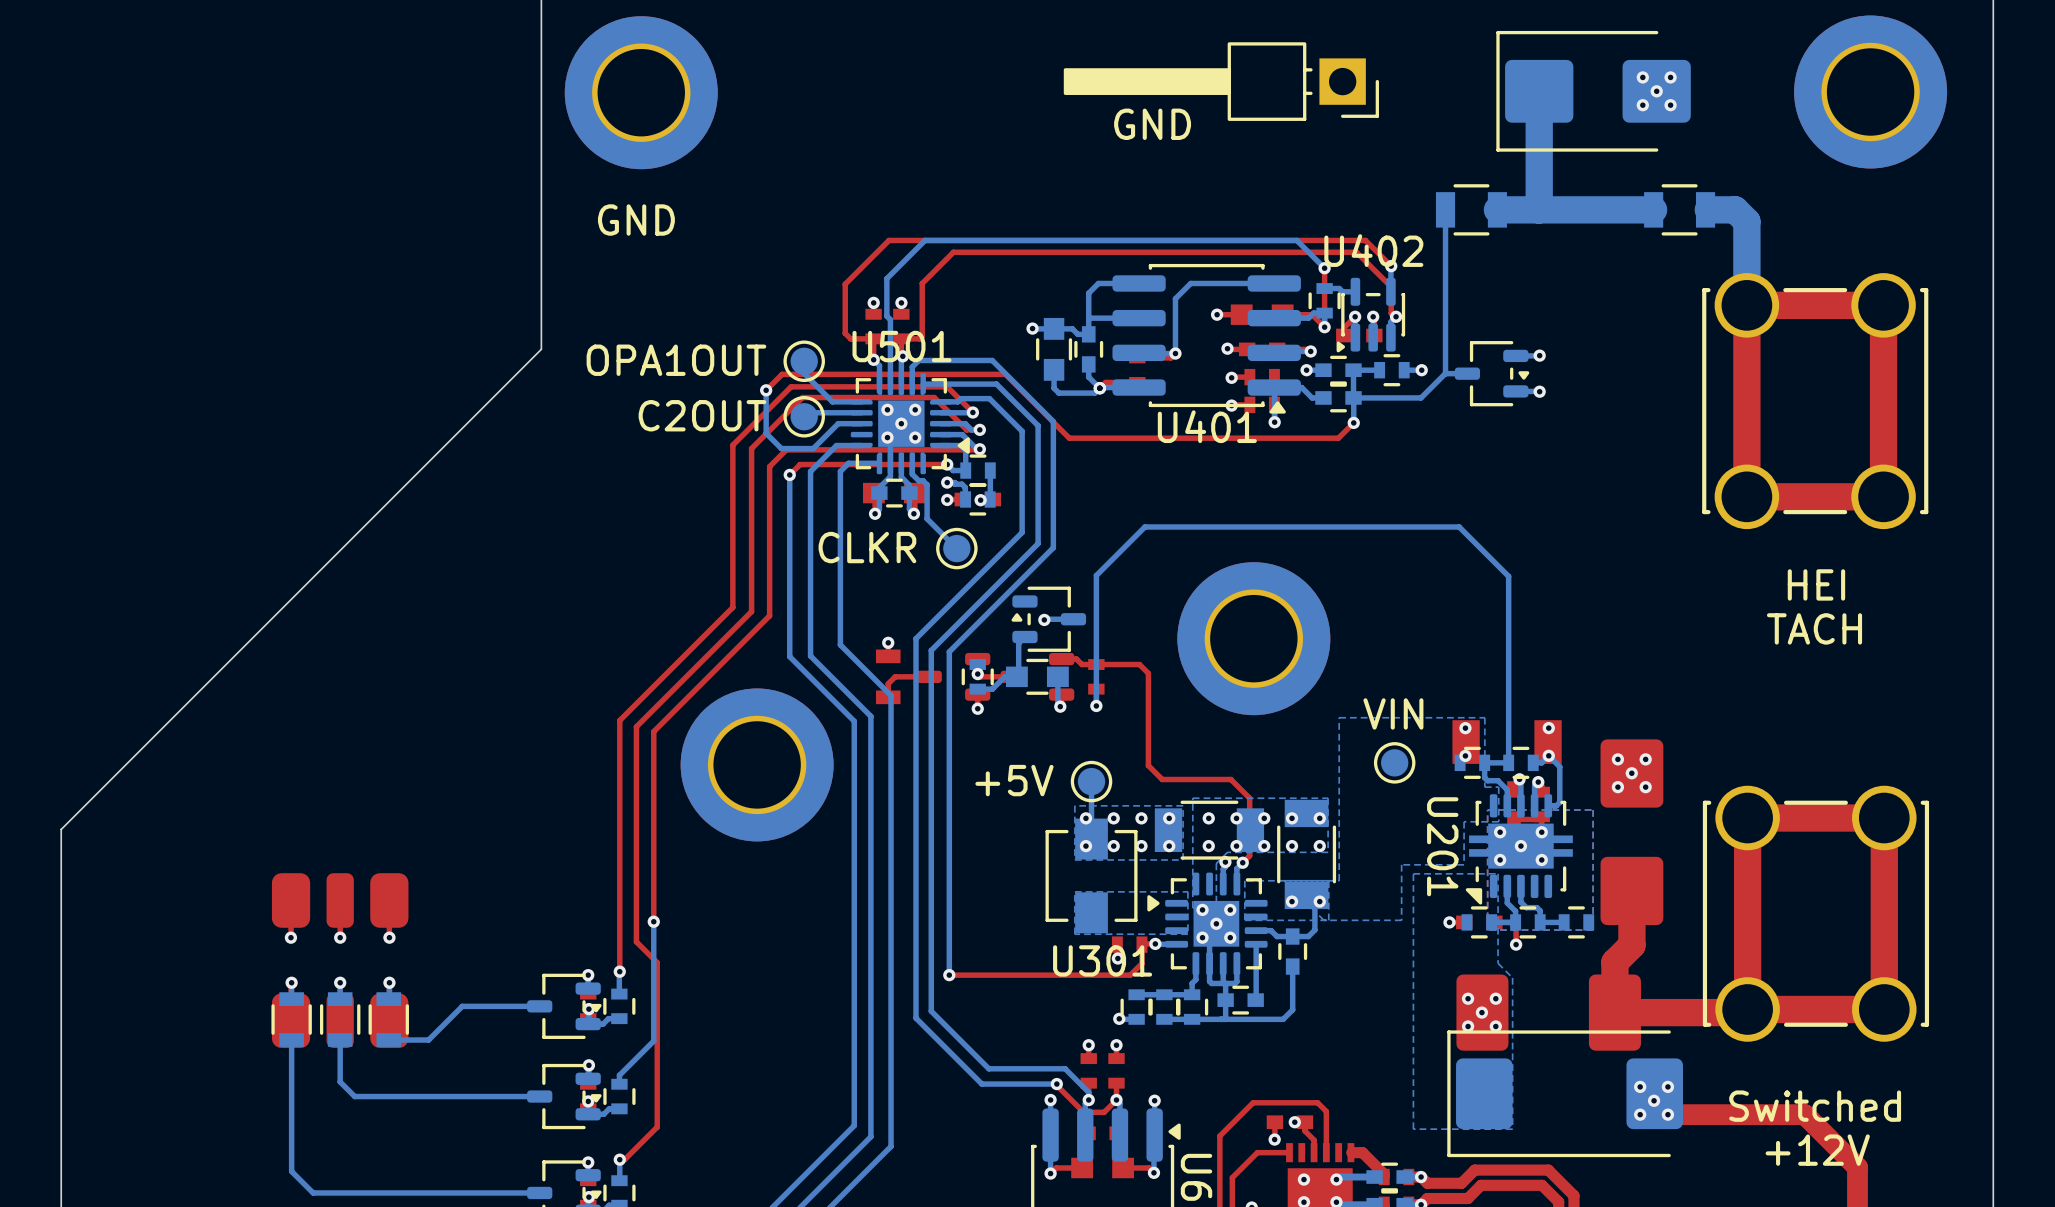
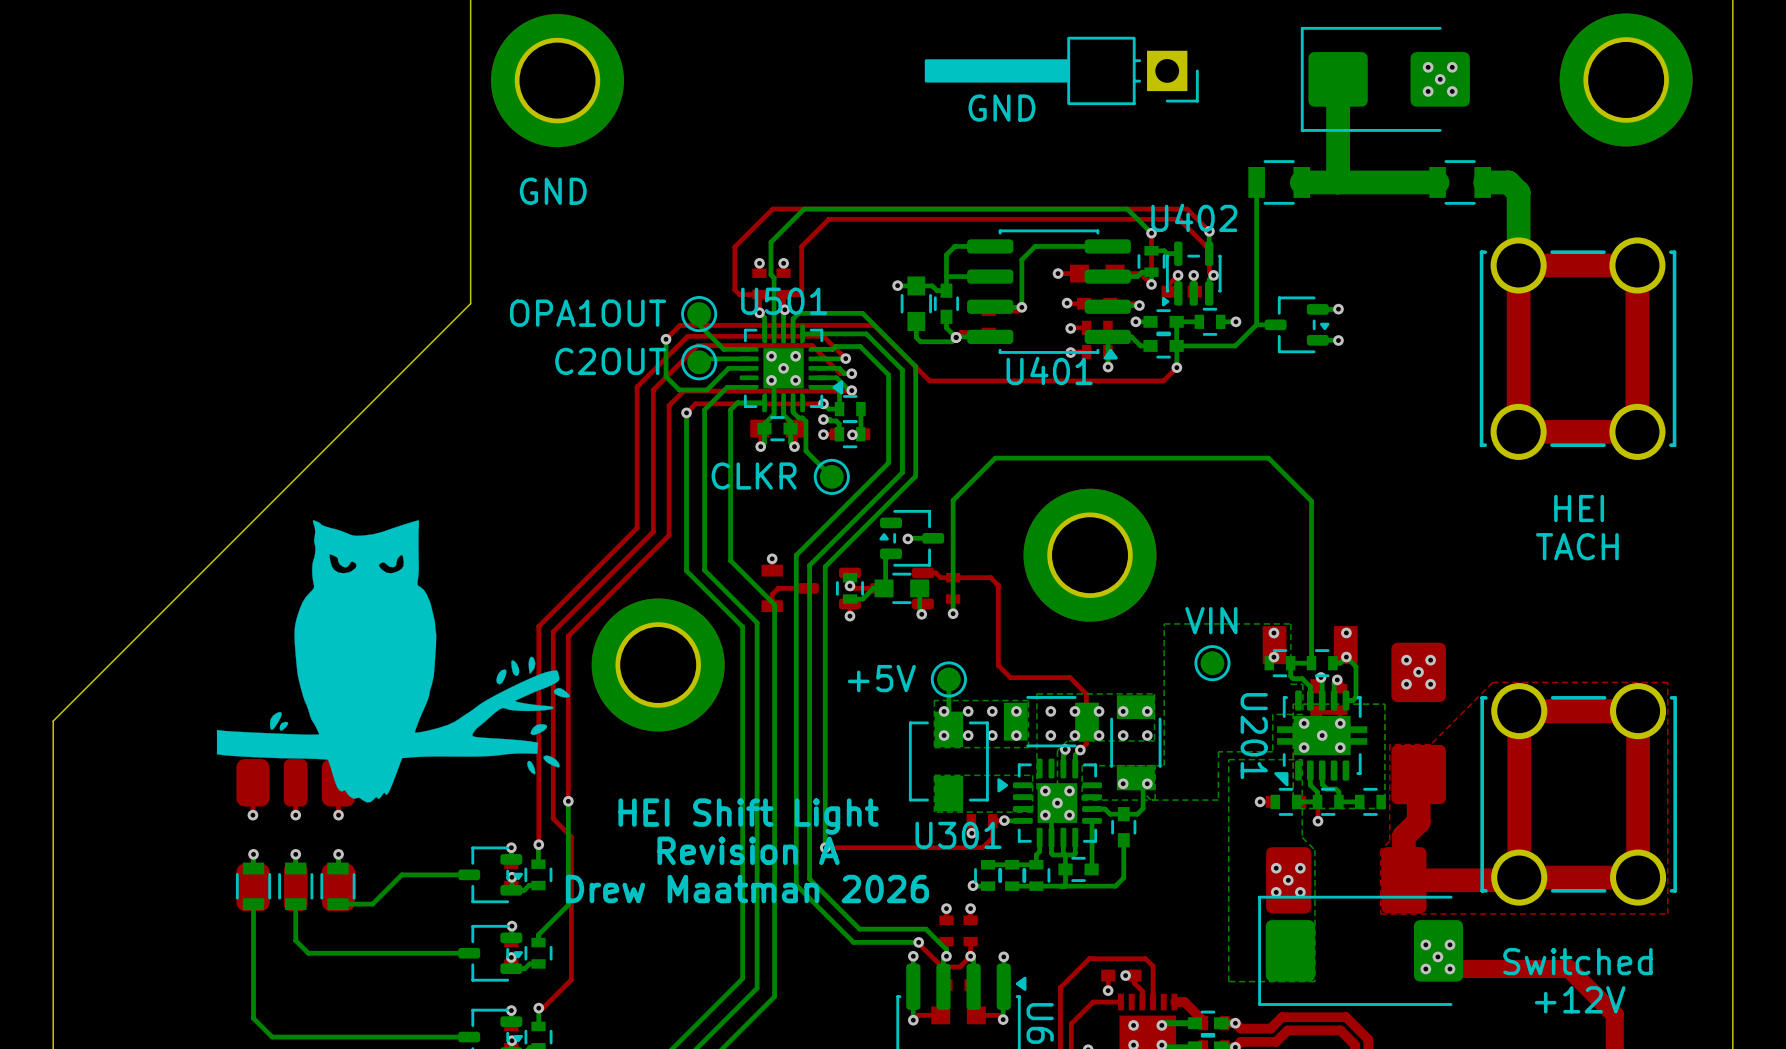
drawing: none -> [216, 520, 570, 803]
top zone outline: none -> (1667, 682) (1492, 682) (1430, 744) (1389, 744) (1389, 841) (1380, 850) (1380, 914) (1667, 914) (1667, 682)
text: none -> HEI Shift Light (748, 816)
text: none -> Revision A (748, 850)
text: none -> Drew Maatman 2026 (747, 889)

